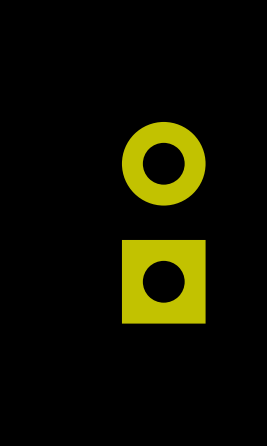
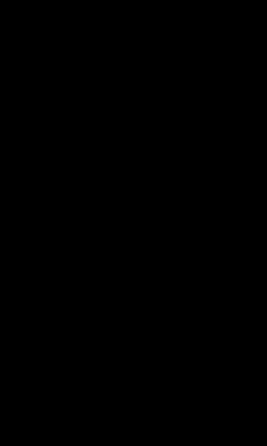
part: (163, 222) -> none

